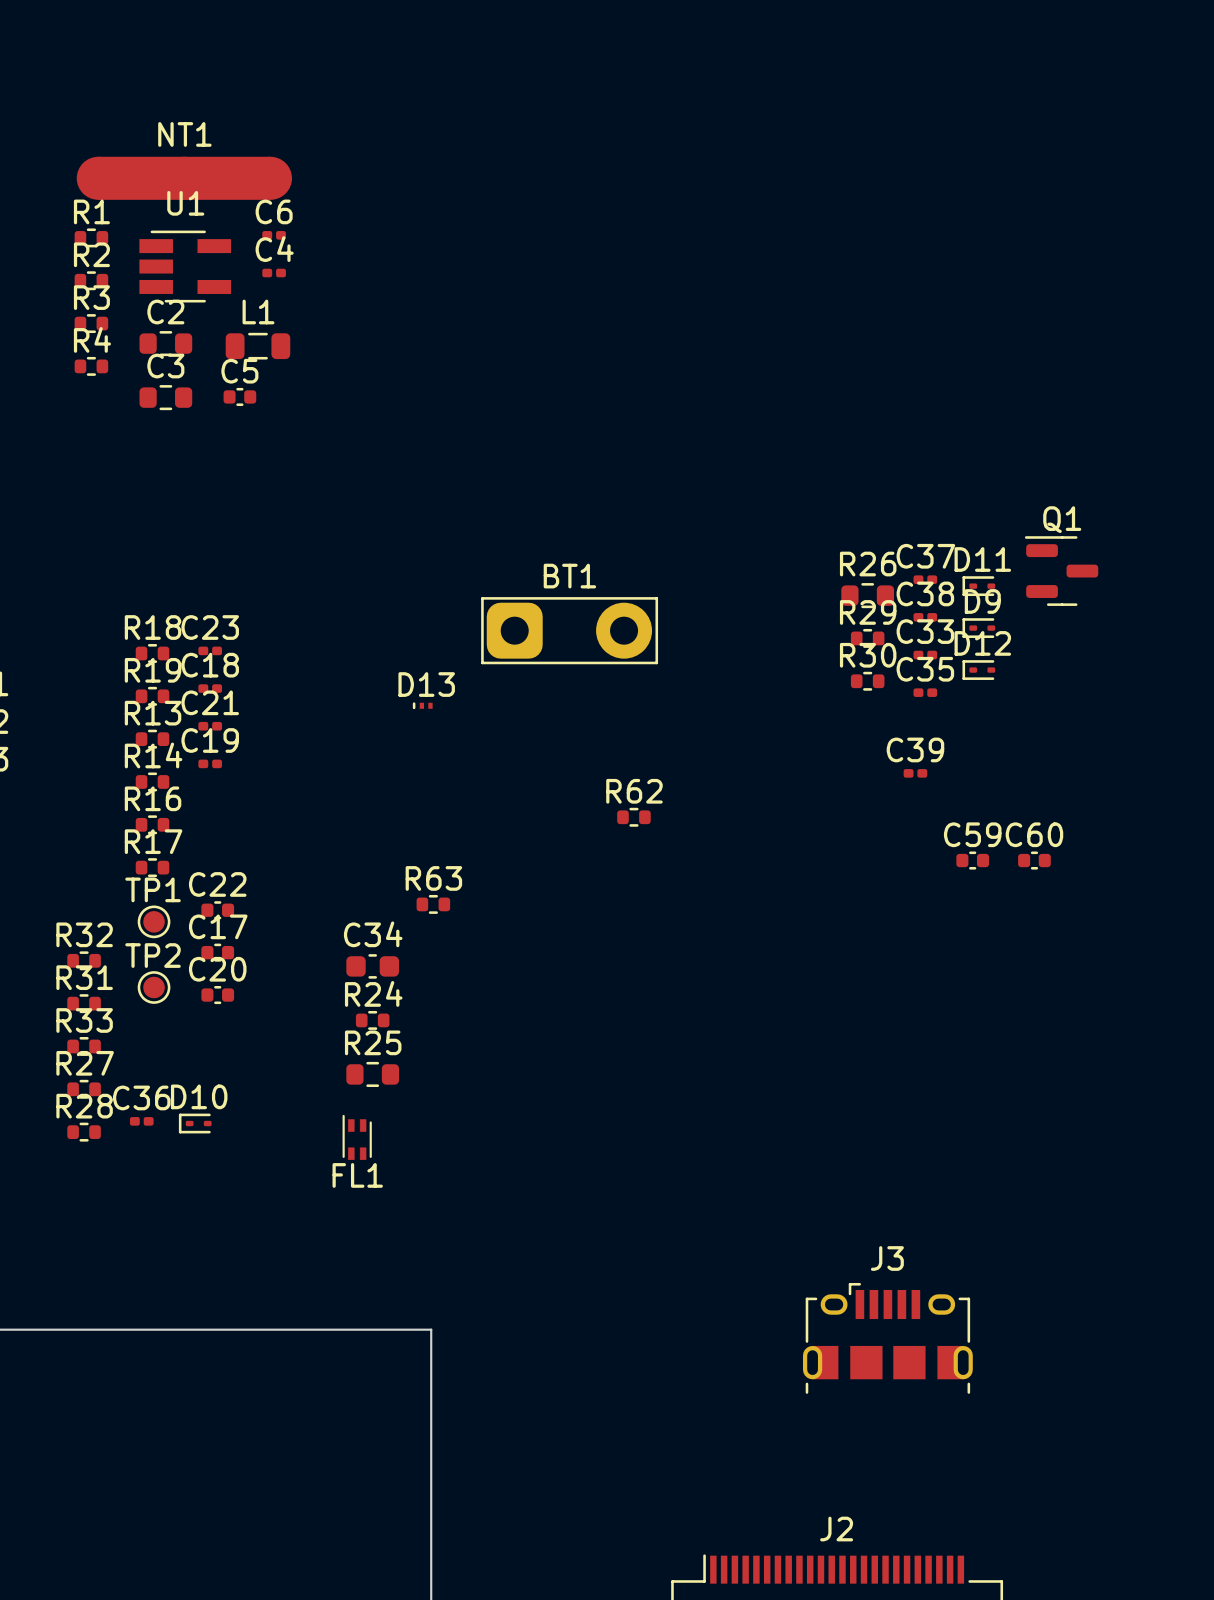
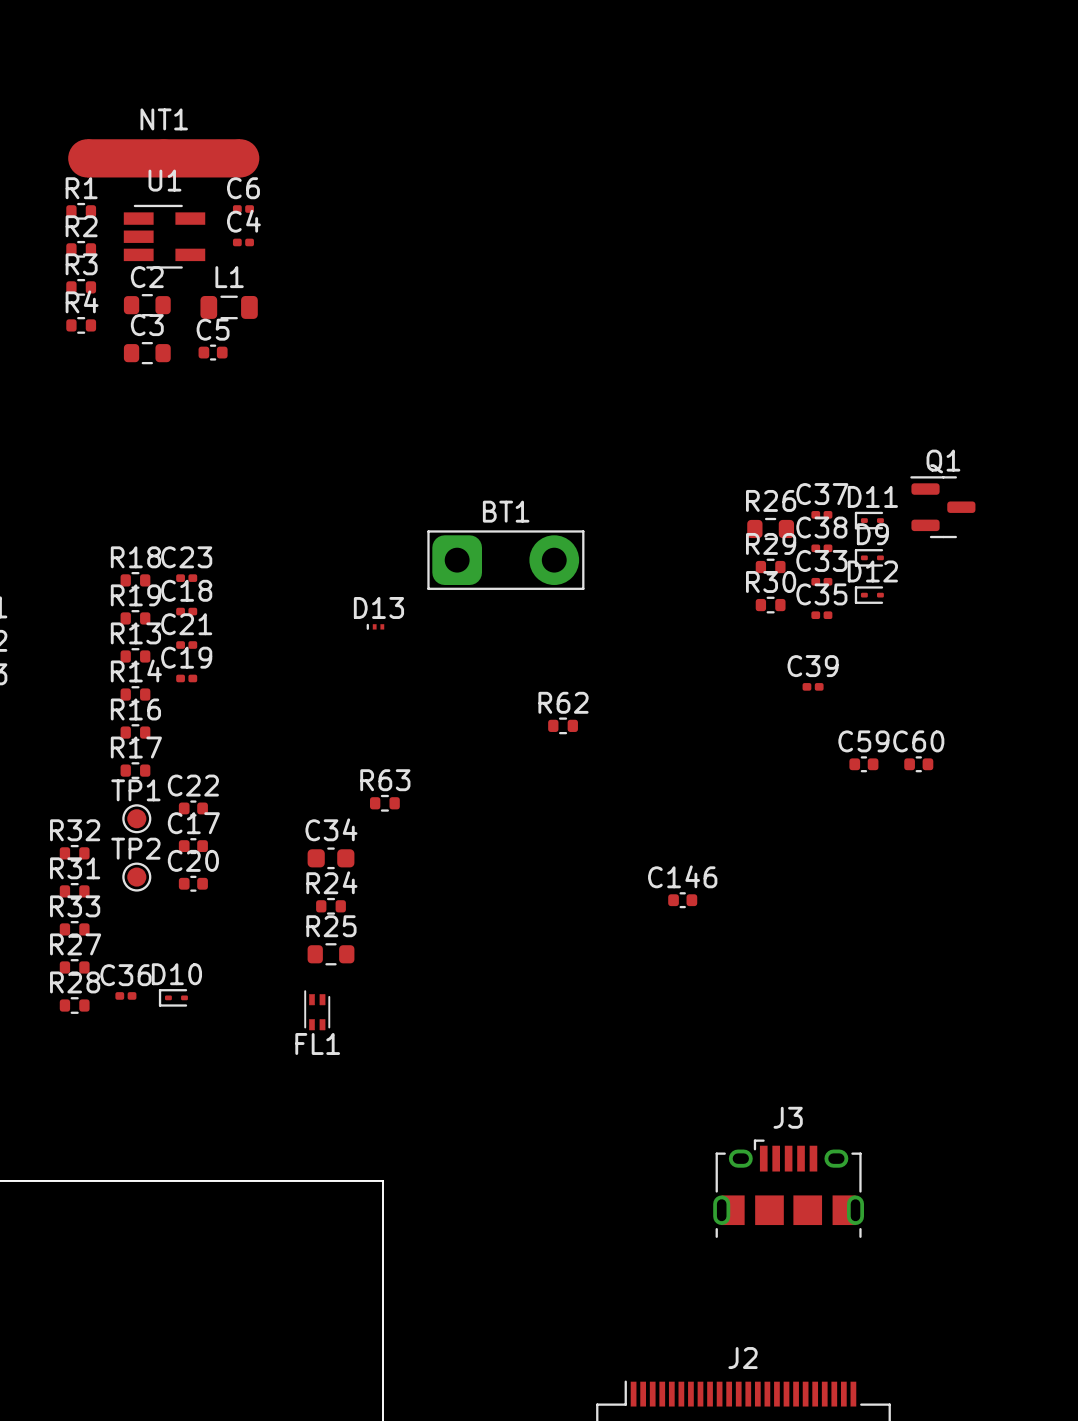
C146: none -> (682, 900)

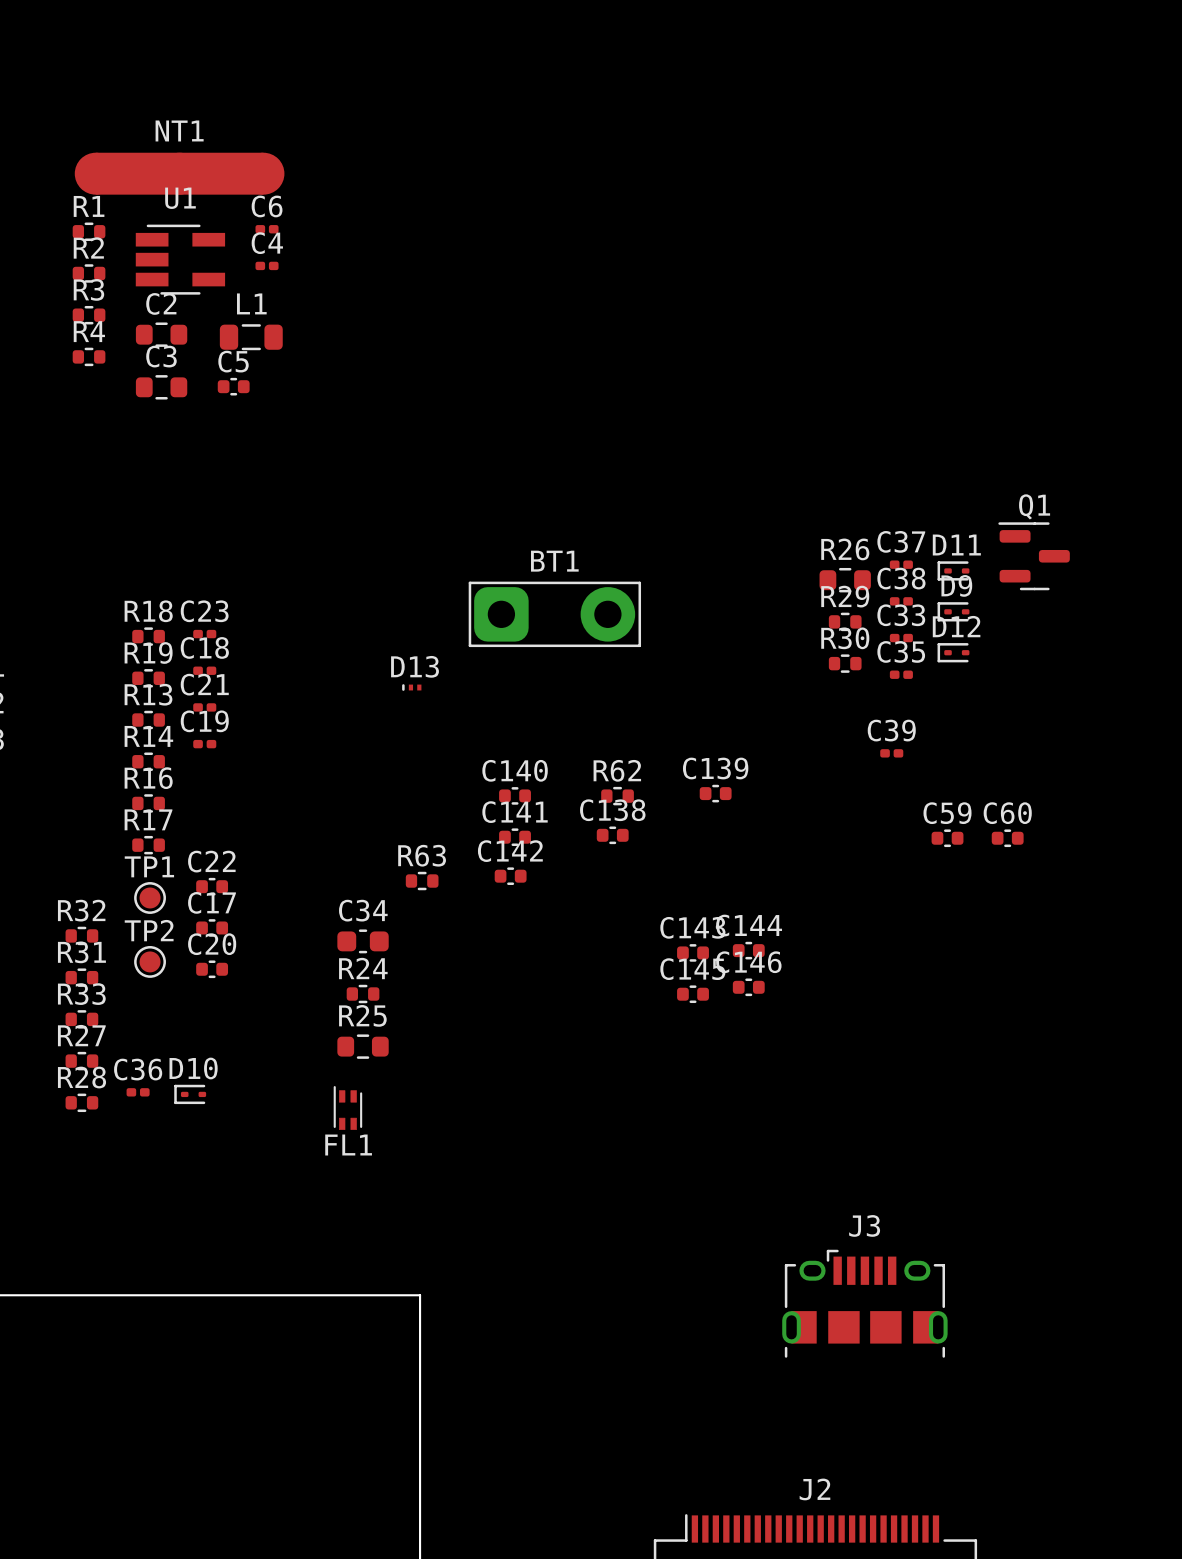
C139: none -> (715, 793)
C140: none -> (515, 795)
C138: none -> (612, 835)
C141: none -> (515, 837)
C142: none -> (510, 876)
C144: none -> (748, 950)
C143: none -> (693, 952)
C145: none -> (693, 994)

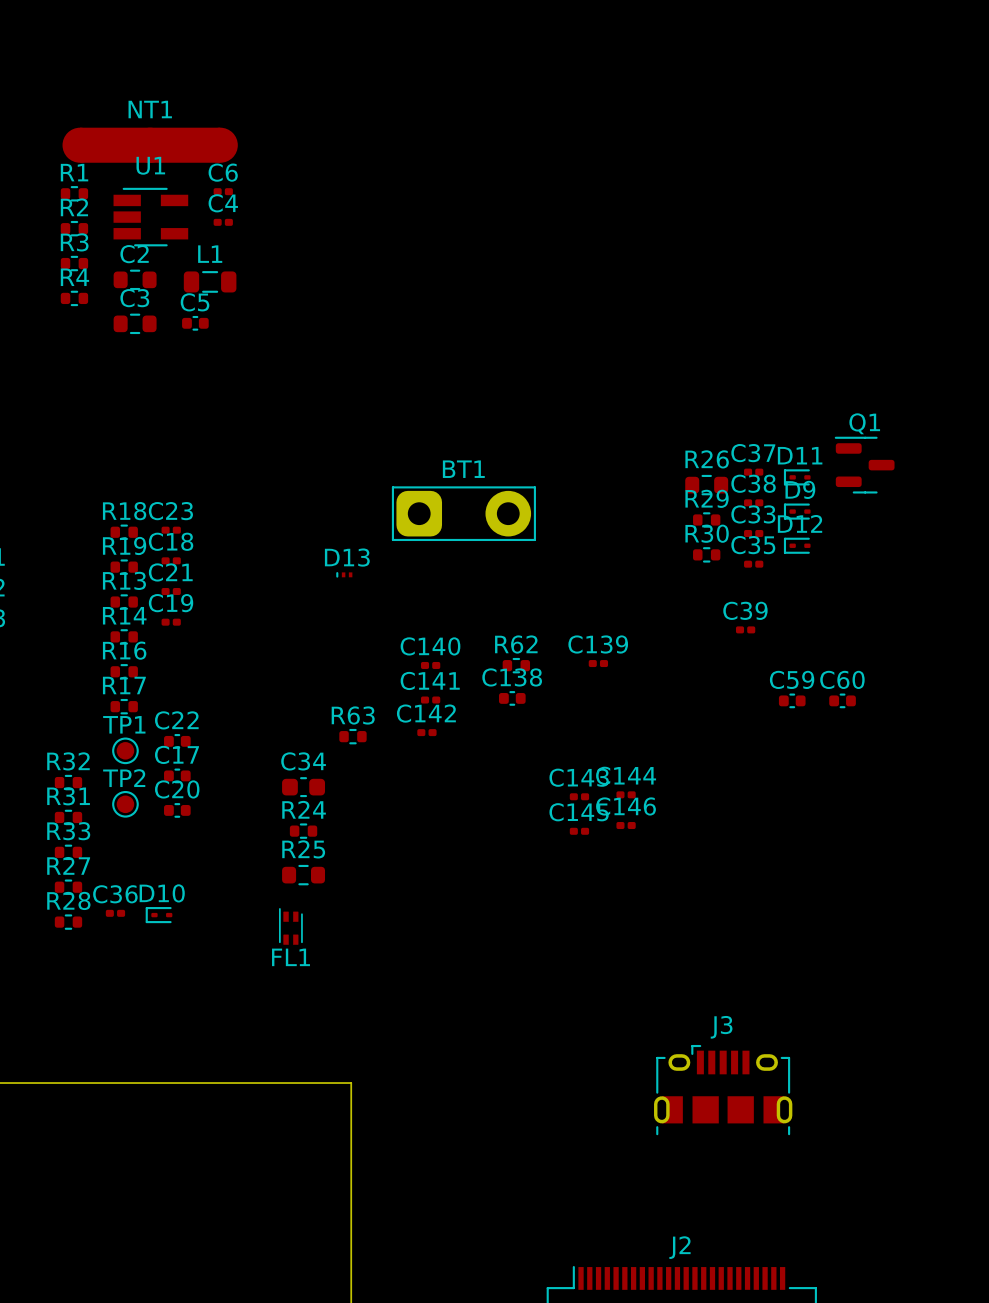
C139 footprint: [699, 784, 732, 803] -> [588, 660, 609, 668]
C140 footprint: [499, 787, 531, 805] -> [420, 661, 441, 669]
C141 footprint: [499, 828, 531, 847] -> [420, 696, 441, 704]
C142 footprint: [494, 867, 527, 885] -> [417, 729, 437, 737]
C144 footprint: [732, 941, 765, 960] -> [616, 791, 636, 799]
C143 footprint: [677, 944, 709, 962] -> [569, 793, 590, 801]
C146 footprint: [732, 978, 765, 997] -> [616, 822, 636, 830]
C145 footprint: [677, 985, 709, 1004] -> [569, 827, 590, 835]

